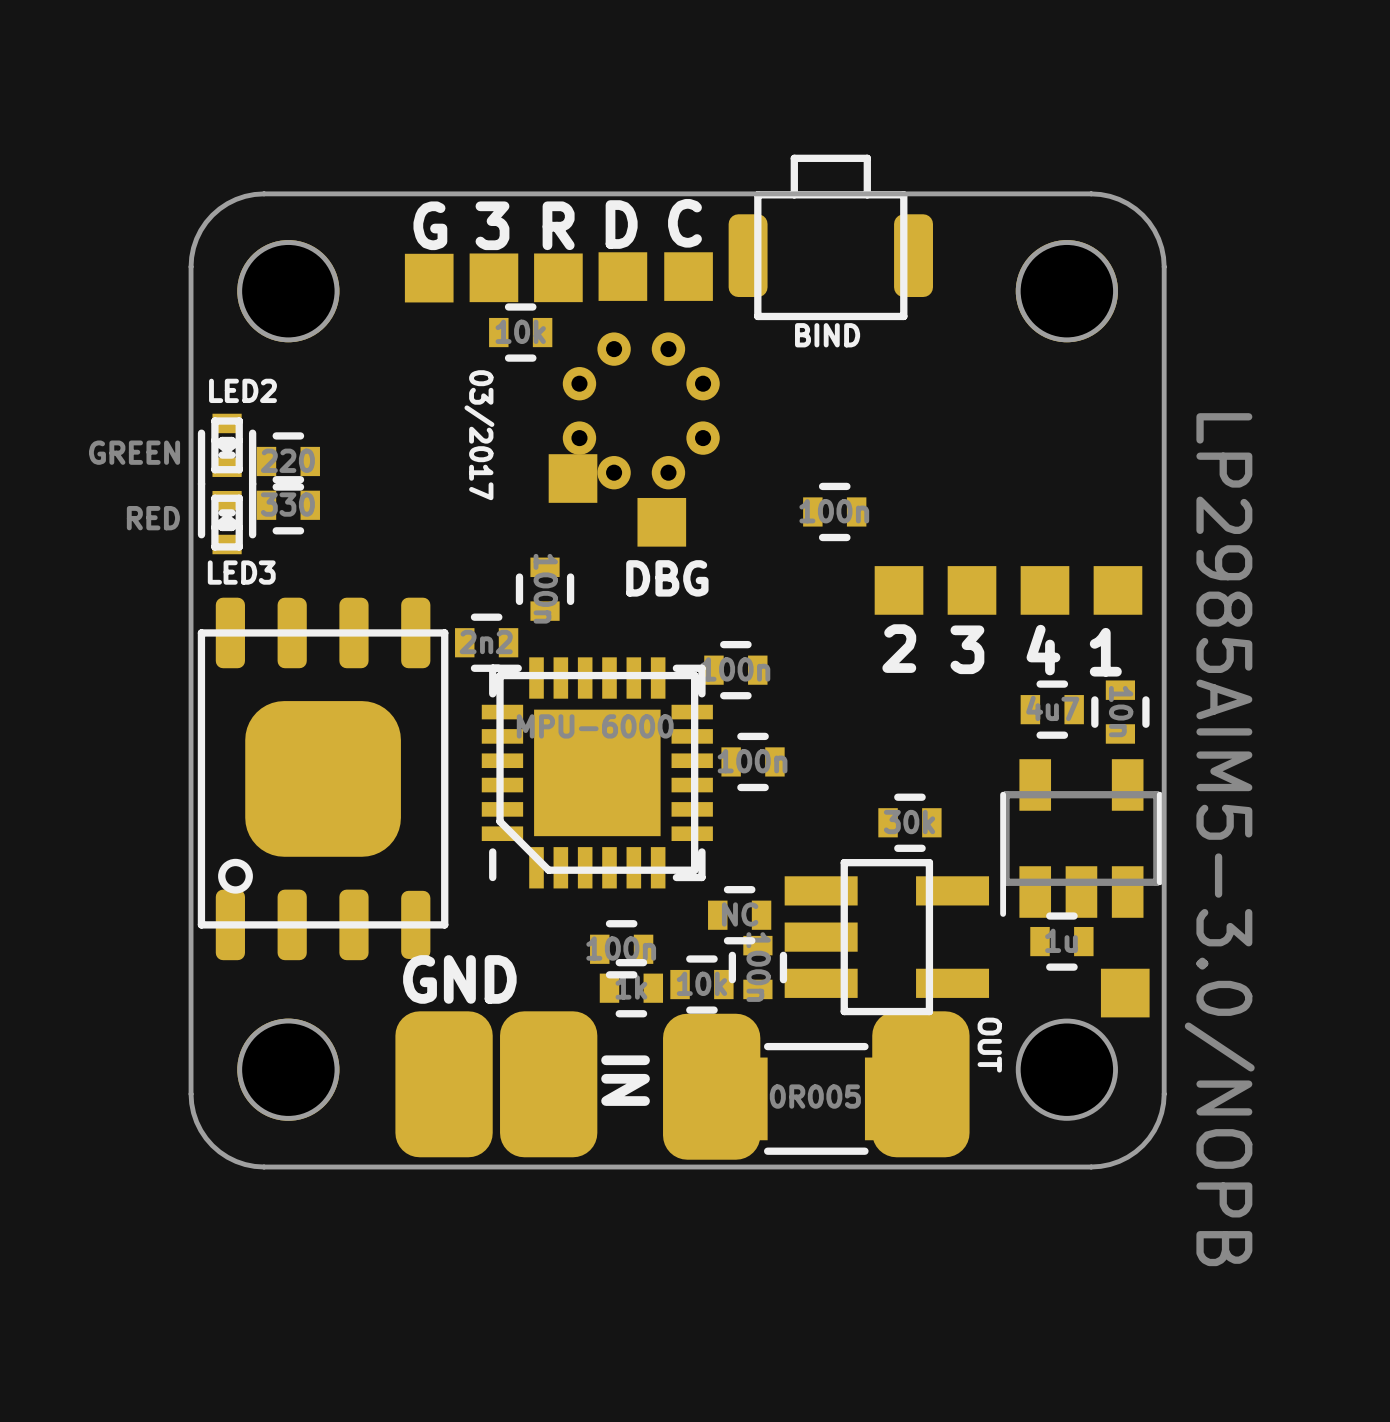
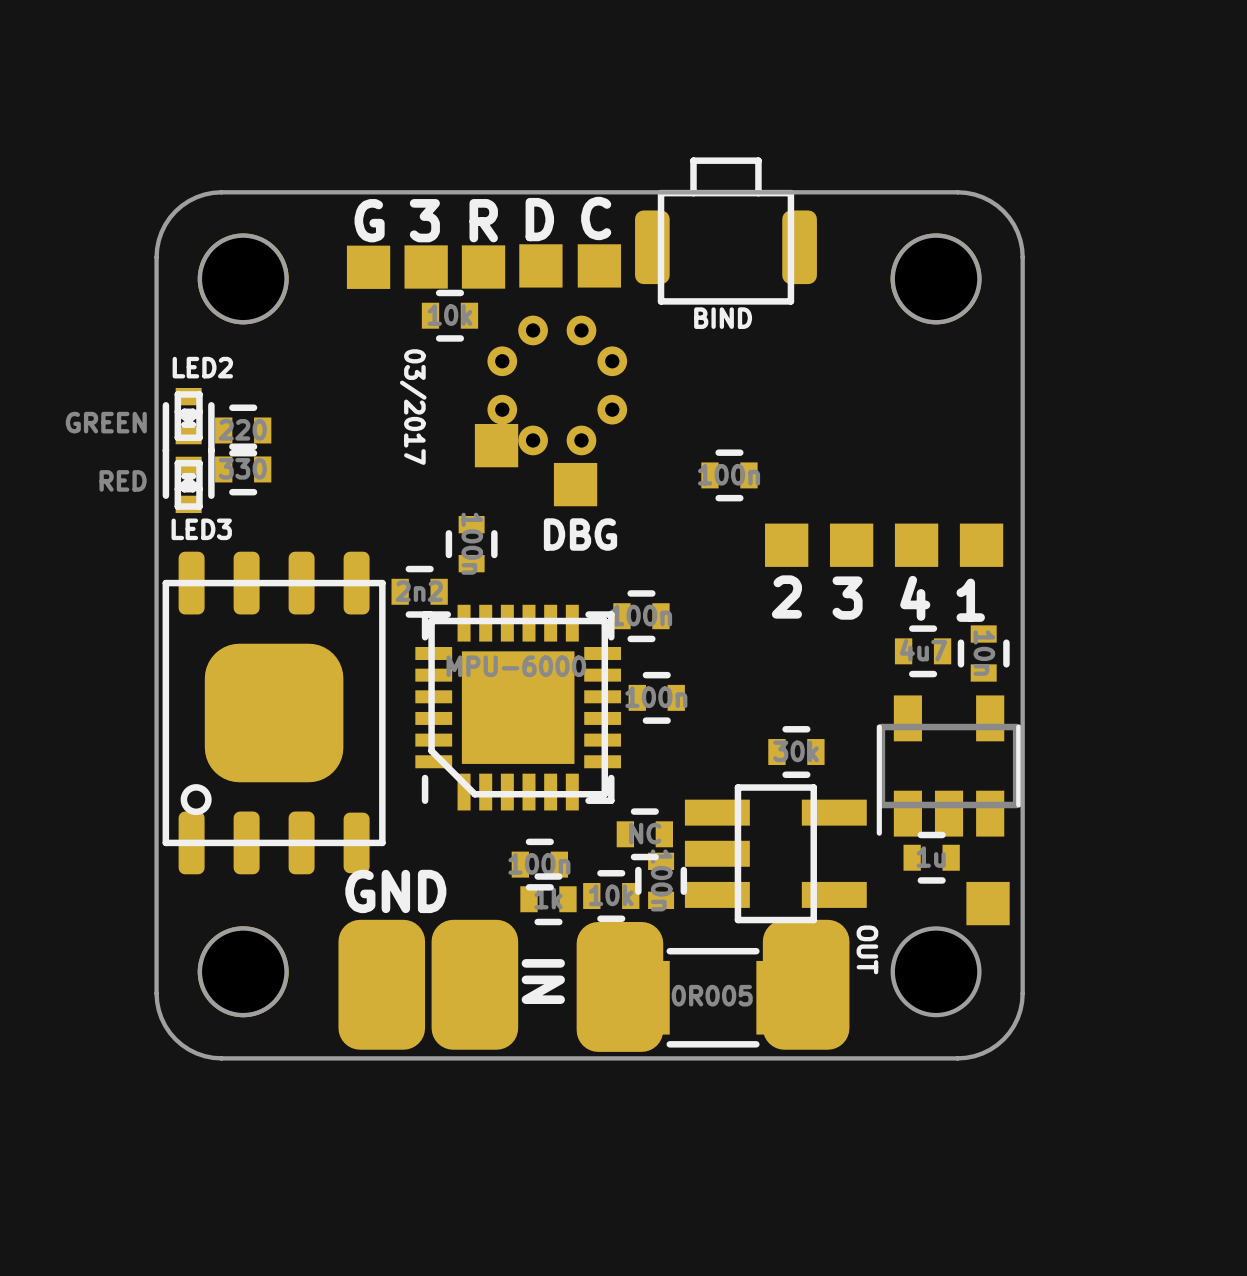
part value: LP2985AIM5-3.0/NOPB (1219, 839) -> none

